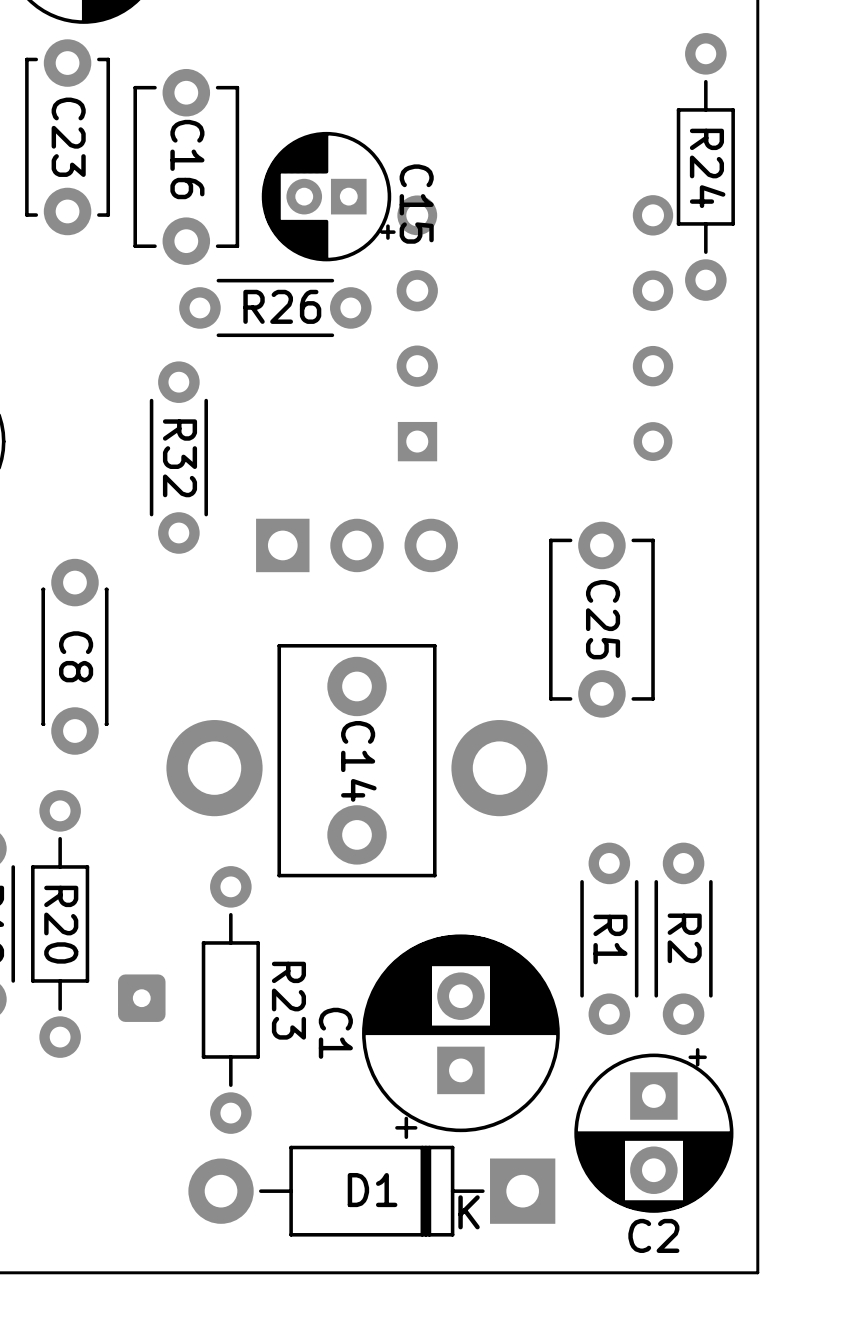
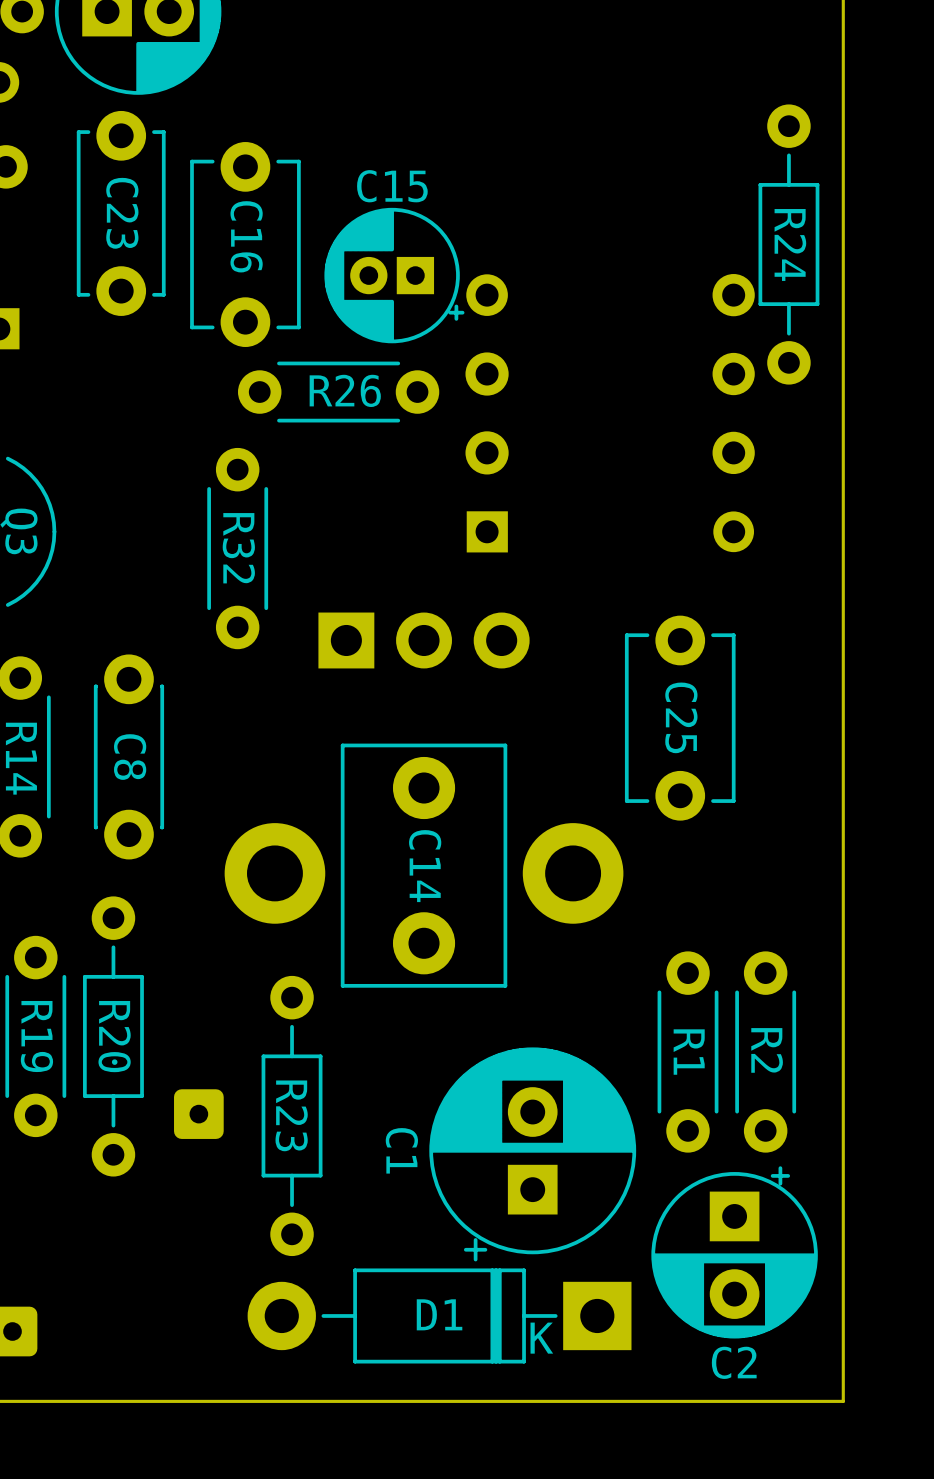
C15 name rotation: 0° (416, 204) -> 90° counterclockwise (392, 186)
C15 name position: C15 (416, 204) -> C15 (392, 186)
R23 name position: R23 (288, 1000) -> R23 (291, 1115)

